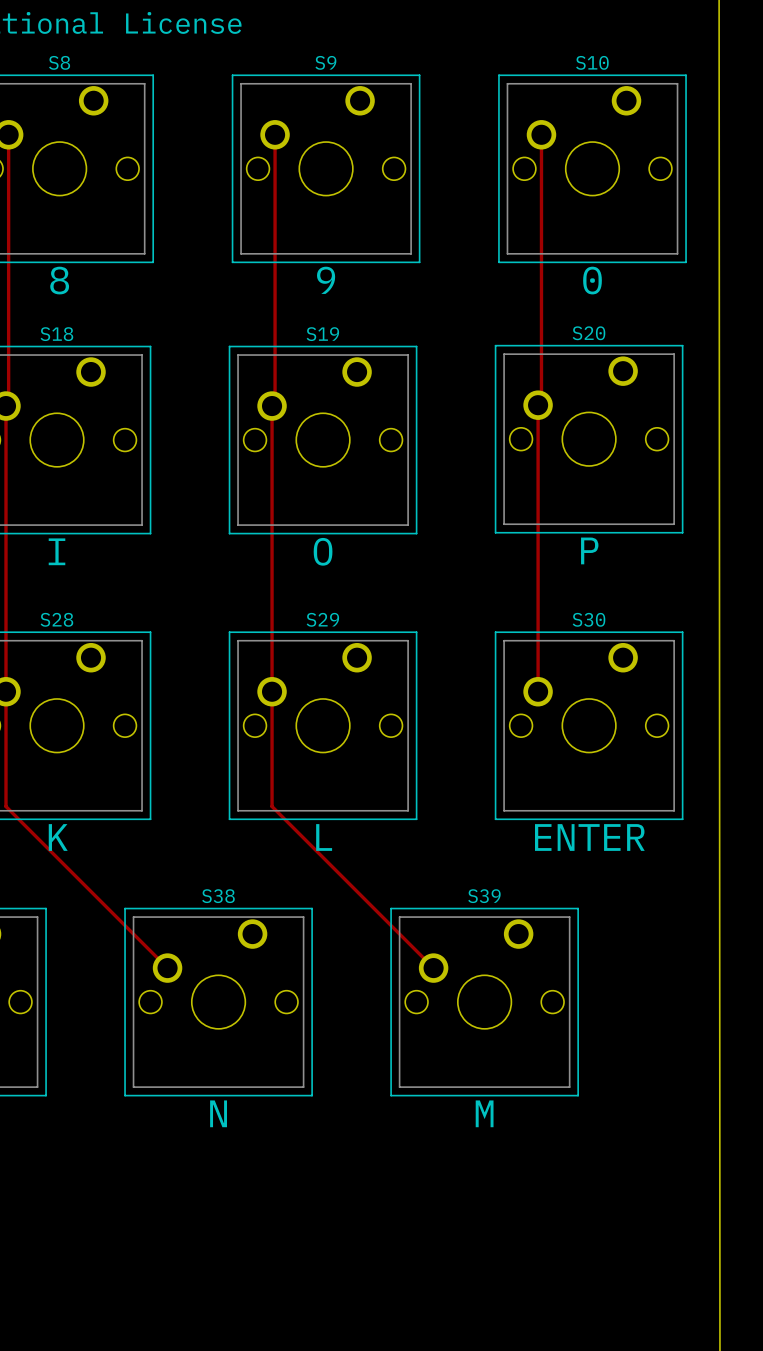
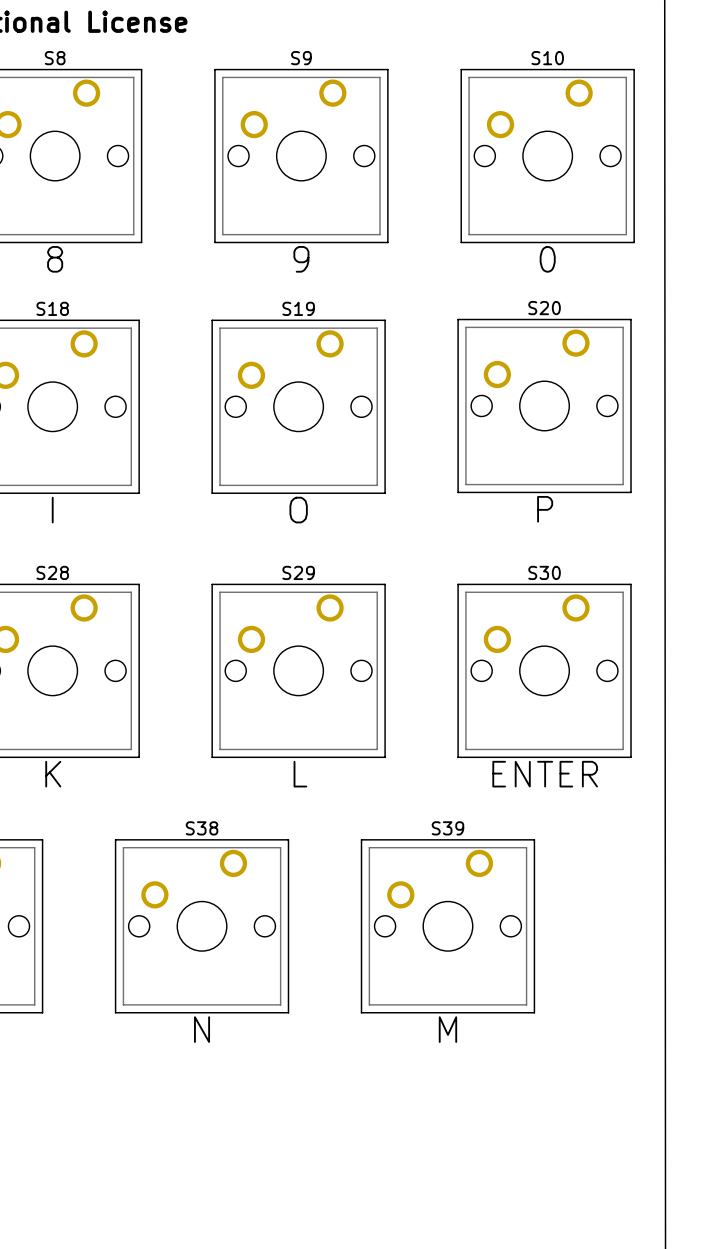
track: (8, 134) (8, 403) (5, 406) (5, 806) (167, 968) -> none
track: (275, 134) (275, 403) (272, 406) (272, 806) (433, 968) -> none
track: (541, 134) (541, 401) (538, 405) (538, 691) -> none

